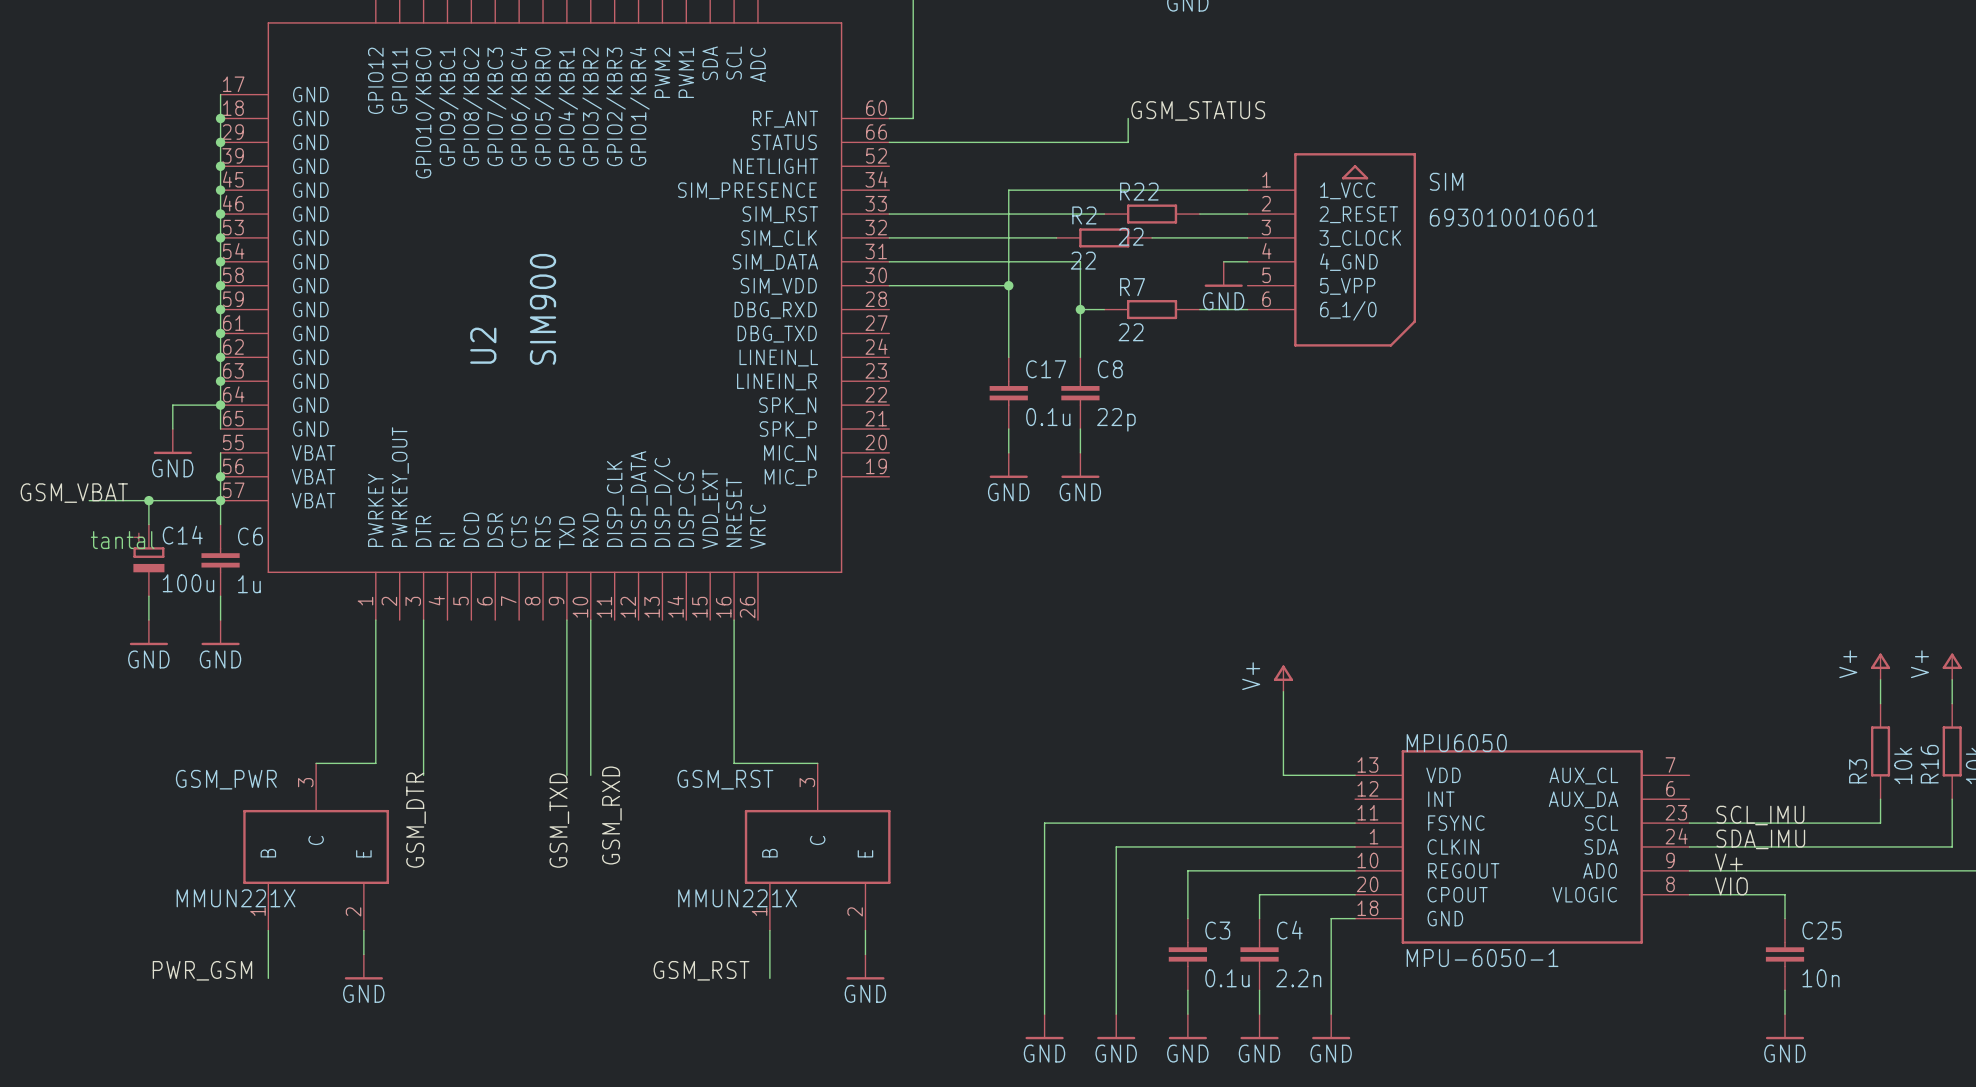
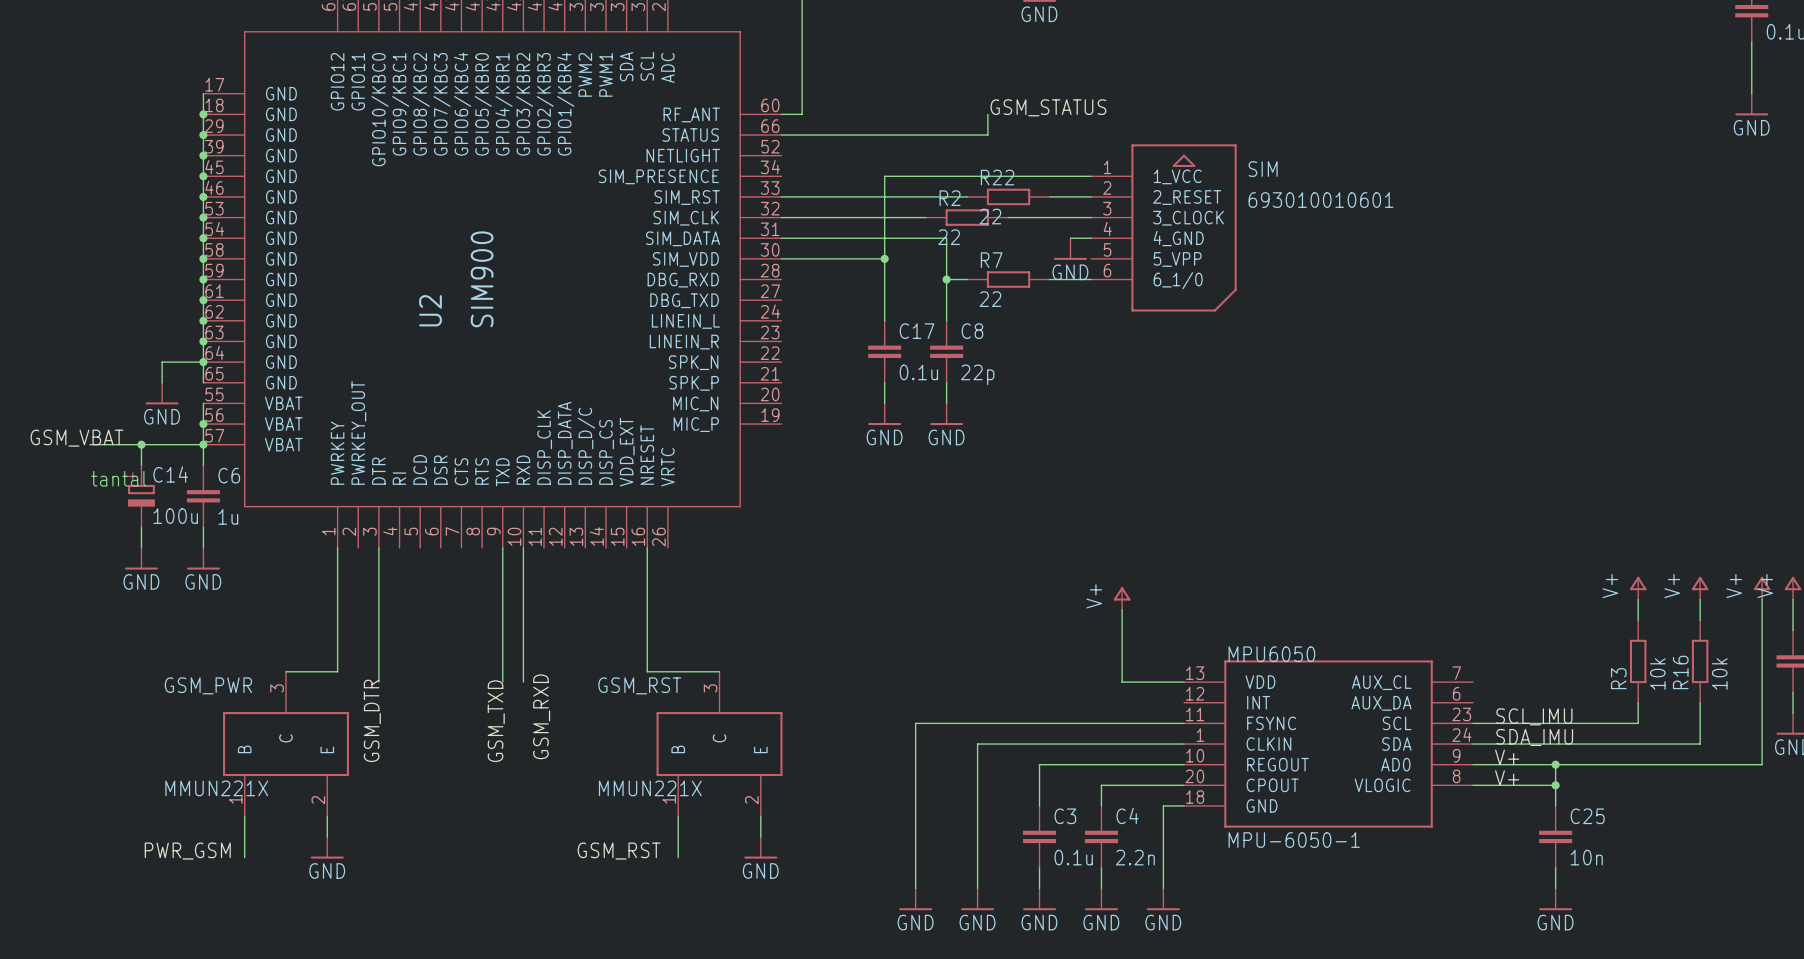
wire: none -> (1555, 764) (1555, 785)
junction: none -> (1555, 764)
label: VIO (1731, 886) -> V+ (1507, 778)
junction: none -> (1555, 785)

